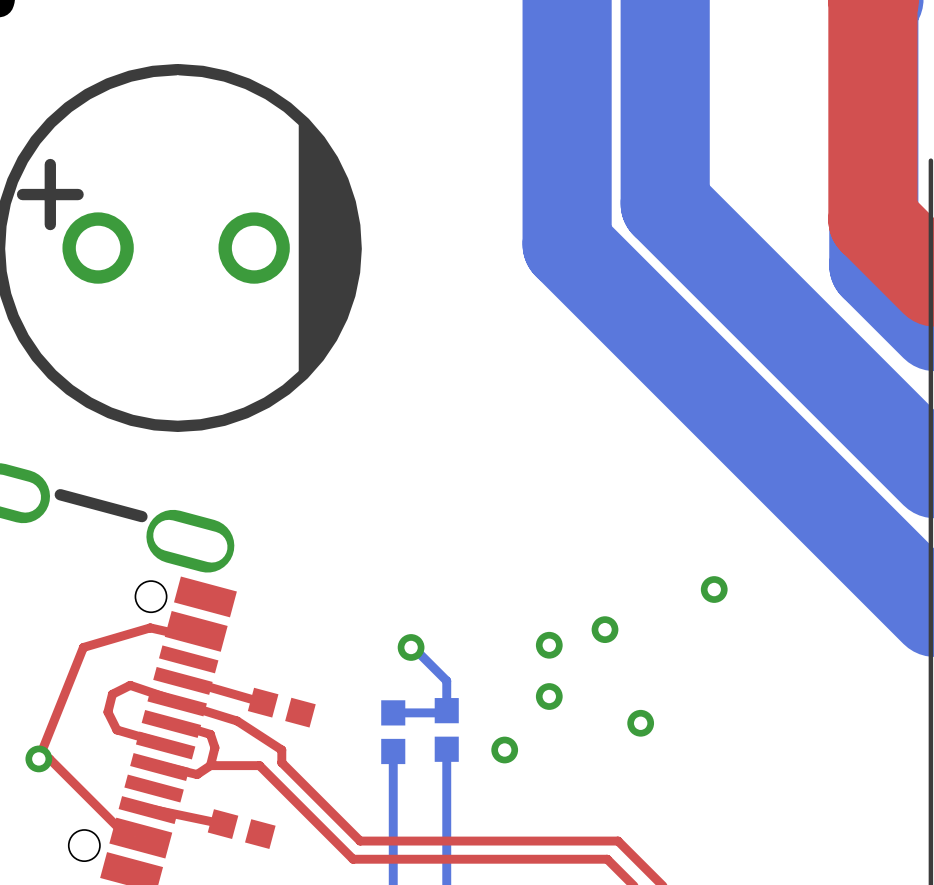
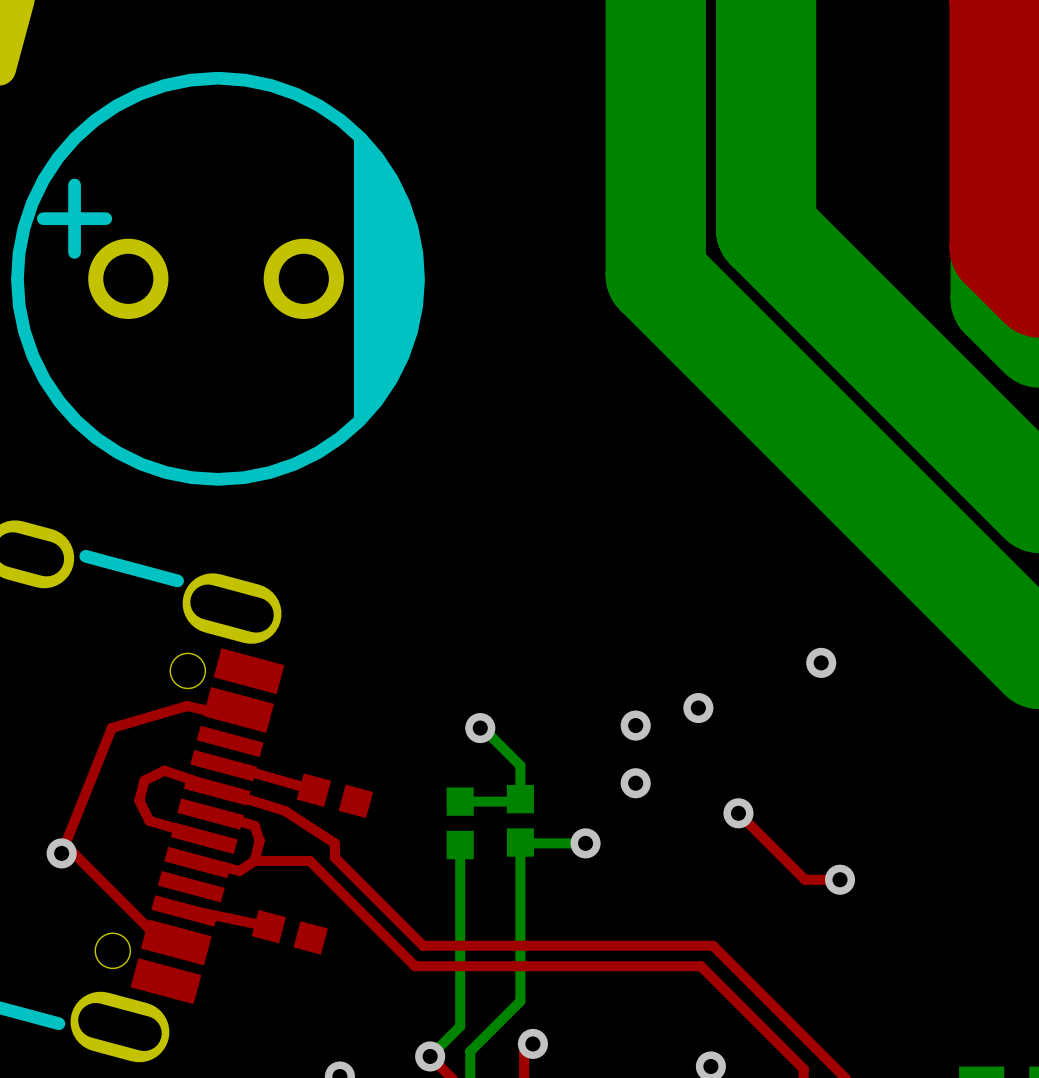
top track: none -> (738, 813) (804, 879) (840, 879)
bottom track: none -> (520, 842) (585, 843)
via: none -> (840, 879)

